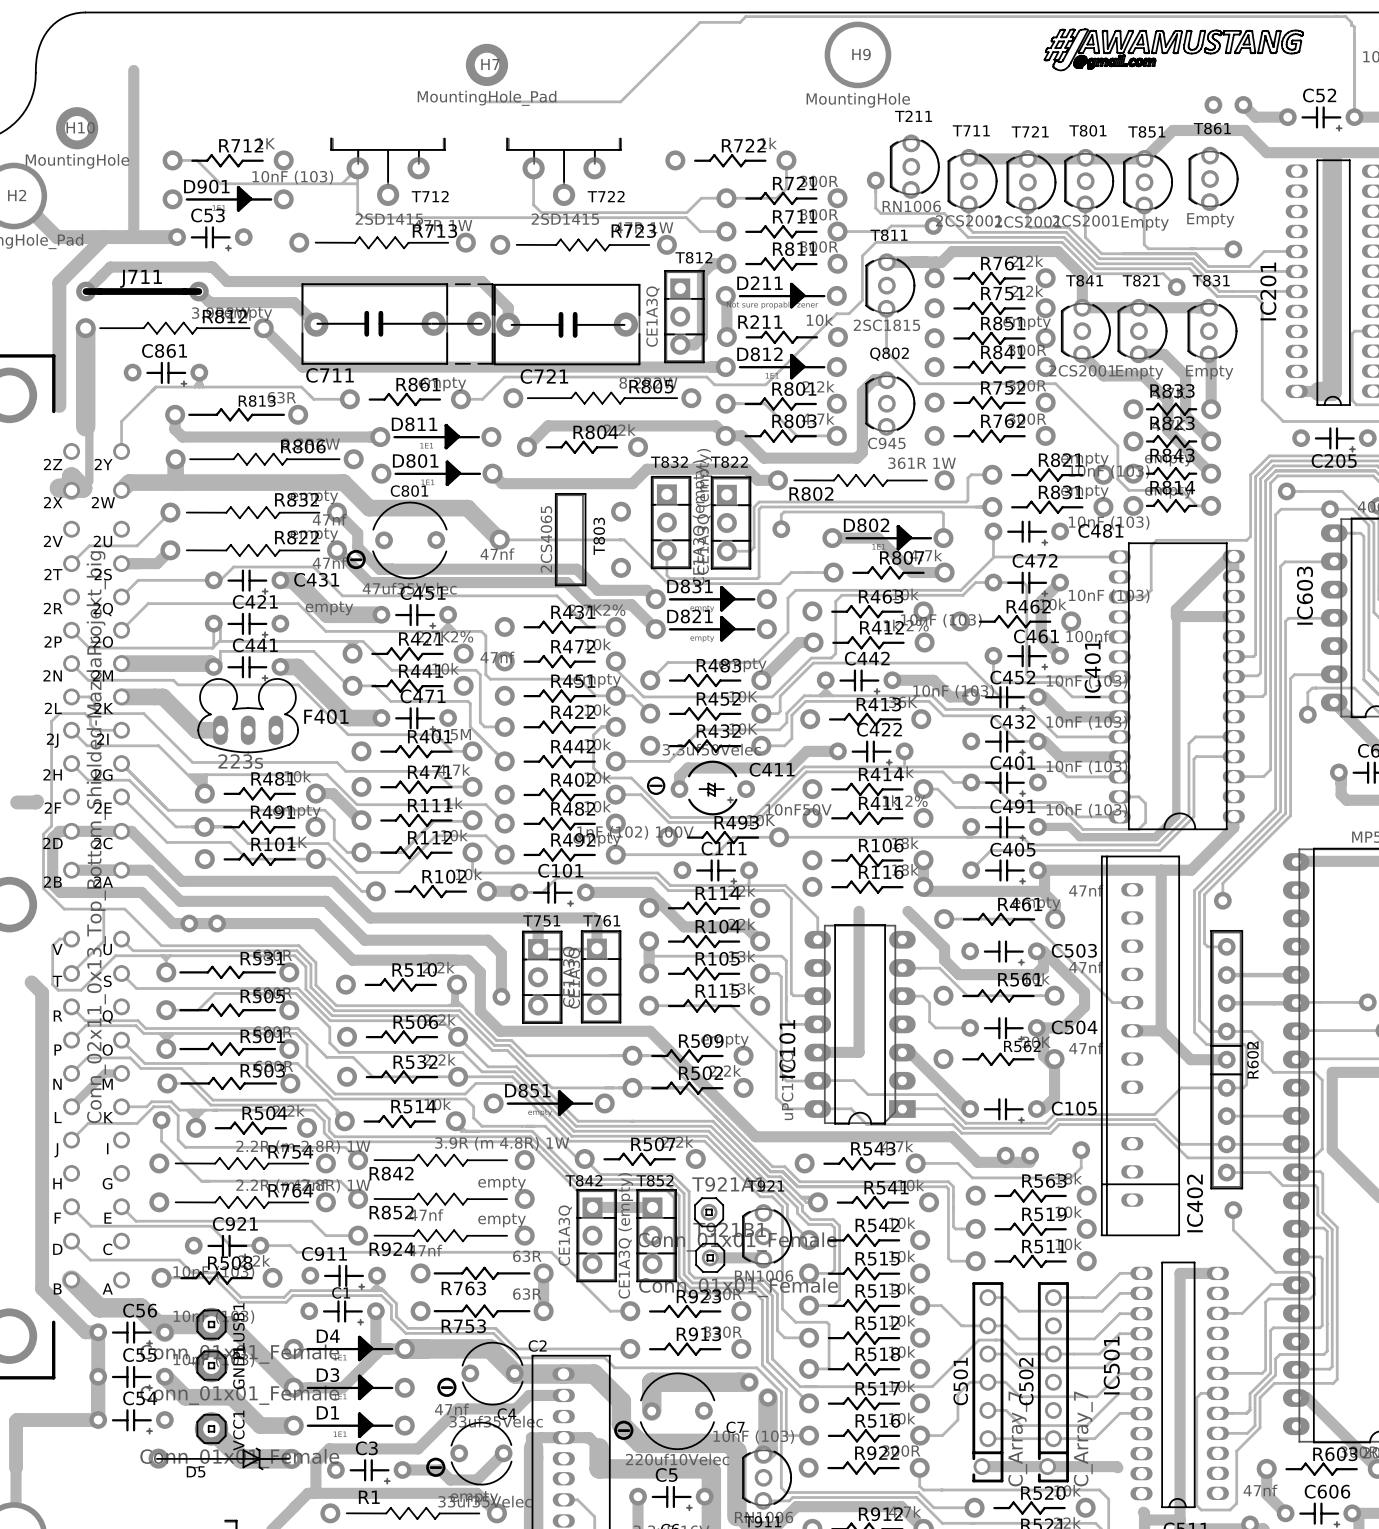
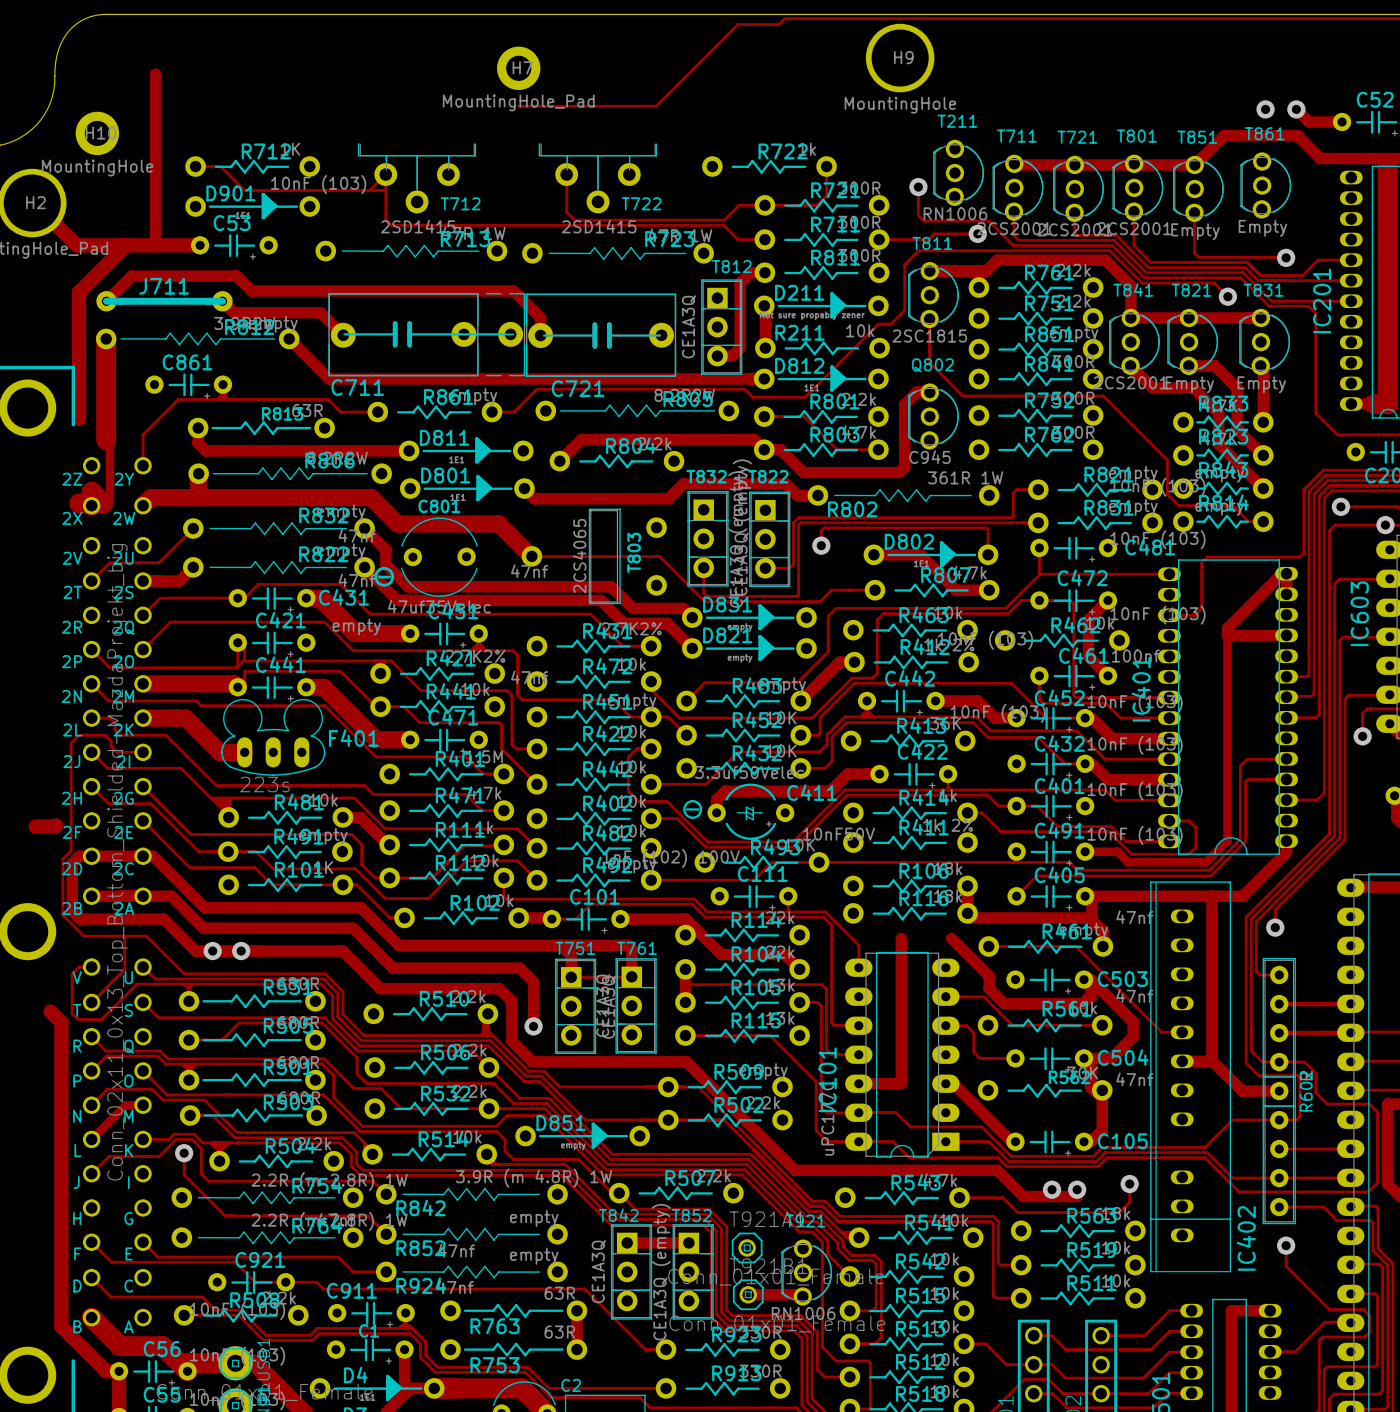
line: (1072, 29) (1074, 30) (1070, 37) (1073, 38) (1071, 41) (1068, 41) (1065, 47) (1067, 48) (1066, 51) (1063, 52) (1058, 59) (1054, 59) (1058, 52) (1053, 52) (1049, 59) (1044, 60) (1048, 52) (1046, 52) (1046, 49) (1050, 48) (1054, 41) (1051, 41) (1052, 37) (1056, 37) (1062, 29) (1064, 30) (1061, 37) (1066, 37) (1070, 30) (1072, 29) -> none
line: (1093, 30) (1096, 31) (1099, 52) (1094, 53) (1093, 48) (1085, 48) (1082, 52) (1078, 53) (1090, 31) (1093, 30) -> none
line: (1142, 30) (1139, 31) (1128, 53) (1132, 52) (1135, 48) (1143, 48) (1144, 53) (1148, 52) (1146, 31) (1142, 30) -> none
line: (1189, 30) (1186, 31) (1184, 49) (1187, 52) (1195, 53) (1201, 47) (1205, 31) (1200, 31) (1197, 46) (1192, 49) (1188, 47) (1191, 31) (1189, 30) -> none
line: (1216, 30) (1221, 31) (1220, 34) (1214, 34) (1212, 37) (1219, 43) (1219, 48) (1214, 53) (1206, 52) (1205, 48) (1211, 49) (1214, 47) (1207, 36) (1210, 32) (1216, 30) -> none
line: (1224, 30) (1223, 34) (1229, 34) (1225, 52) (1229, 53) (1233, 34) (1239, 34) (1240, 31) (1224, 30) -> none
line: (1249, 30) (1252, 31) (1255, 52) (1250, 53) (1250, 48) (1241, 48) (1239, 52) (1235, 53) (1246, 31) (1249, 30) -> none
line: (1264, 30) (1258, 52) (1262, 52) (1265, 35) (1270, 52) (1275, 52) (1280, 31) (1276, 31) (1273, 47) (1268, 31) (1264, 30) -> none
line: (1295, 30) (1302, 32) (1302, 35) (1291, 35) (1287, 39) (1286, 45) (1289, 49) (1294, 49) (1296, 43) (1291, 43) (1292, 40) (1300, 40) (1299, 51) (1286, 52) (1282, 47) (1283, 38) (1288, 32) (1295, 30) -> none
line: (1159, 34) (1156, 52) (1152, 53) (1156, 31) (1163, 31) (1165, 46) (1174, 31) (1180, 30) (1177, 52) (1173, 52) (1177, 34) -> none
line: (1159, 34) (1162, 52) (1164, 53) (1167, 52) (1177, 34) -> none
line: (1092, 35) (1087, 44) (1093, 44) (1092, 35) -> none
line: (1142, 35) (1143, 44) (1137, 44) (1142, 35) -> none
line: (1248, 35) (1249, 44) (1243, 44) (1248, 35) -> none
line: (1116, 37) (1109, 52) (1104, 53) (1102, 31) (1107, 31) (1107, 48) -> none
line: (1116, 37) (1117, 52) (1122, 53) (1133, 31) (1128, 31) (1121, 48) -> none
line: (1058, 41) (1064, 41) (1060, 48) (1055, 48) (1058, 41) -> none
line: (1107, 48) (1115, 31) (1118, 30) (1120, 31) (1121, 48) -> none
line: (1081, 55) (1075, 59) (1074, 64) (1076, 67) (1082, 67) (1075, 64) (1076, 60) (1079, 57) (1083, 57) (1084, 60) (1082, 63) (1083, 58) (1079, 58) (1077, 64) (1083, 64) (1086, 62) (1086, 57) (1081, 55) -> none
line: (1120, 55) (1120, 57) (1118, 57) (1118, 56) (1120, 55) -> none
line: (1123, 55) (1122, 55) (1121, 66) (1122, 65) (1123, 55) -> none
line: (1091, 58) (1087, 63) (1089, 66) (1092, 64) (1092, 66) (1088, 68) (1093, 66) (1095, 58) (1091, 58) -> none
line: (1101, 58) (1097, 58) (1096, 66) (1100, 60) (1100, 66) (1105, 60) (1104, 65) (1106, 65) (1107, 59) (1101, 58) -> none
line: (1112, 58) (1116, 58) (1115, 65) (1110, 66) (1109, 61) (1112, 58) -> none
line: (1118, 58) (1120, 58) (1117, 66) (1117, 65) (1118, 58) -> none
line: (1133, 58) (1129, 61) (1130, 66) (1134, 65) (1131, 63) (1132, 60) (1135, 60) (1133, 58) -> none
line: (1139, 58) (1142, 59) (1142, 63) (1137, 66) (1135, 61) (1139, 58) -> none
line: (1149, 58) (1155, 59) (1154, 65) (1152, 65) (1152, 60) (1148, 66) (1148, 60) (1143, 66) (1145, 58) (1149, 58) -> none
line: (1063, 59) (1079, 30) (1087, 29) (1067, 67) (1062, 70) (1056, 68) (1053, 65) (1057, 60) -> none
line: (1062, 60) (1057, 60) -> none
line: (1080, 60) (1081, 61) (1079, 63) (1079, 61) (1080, 60) -> none
line: (1091, 60) (1092, 62) (1090, 64) (1090, 61) (1091, 60) -> none
line: (1112, 60) (1113, 62) (1111, 64) (1111, 61) (1112, 60) -> none
line: (1139, 60) (1137, 61) (1138, 64) (1140, 62) (1139, 60) -> none
line: (1126, 63) (1125, 64) (1125, 66) (1127, 65) (1126, 63) -> none

